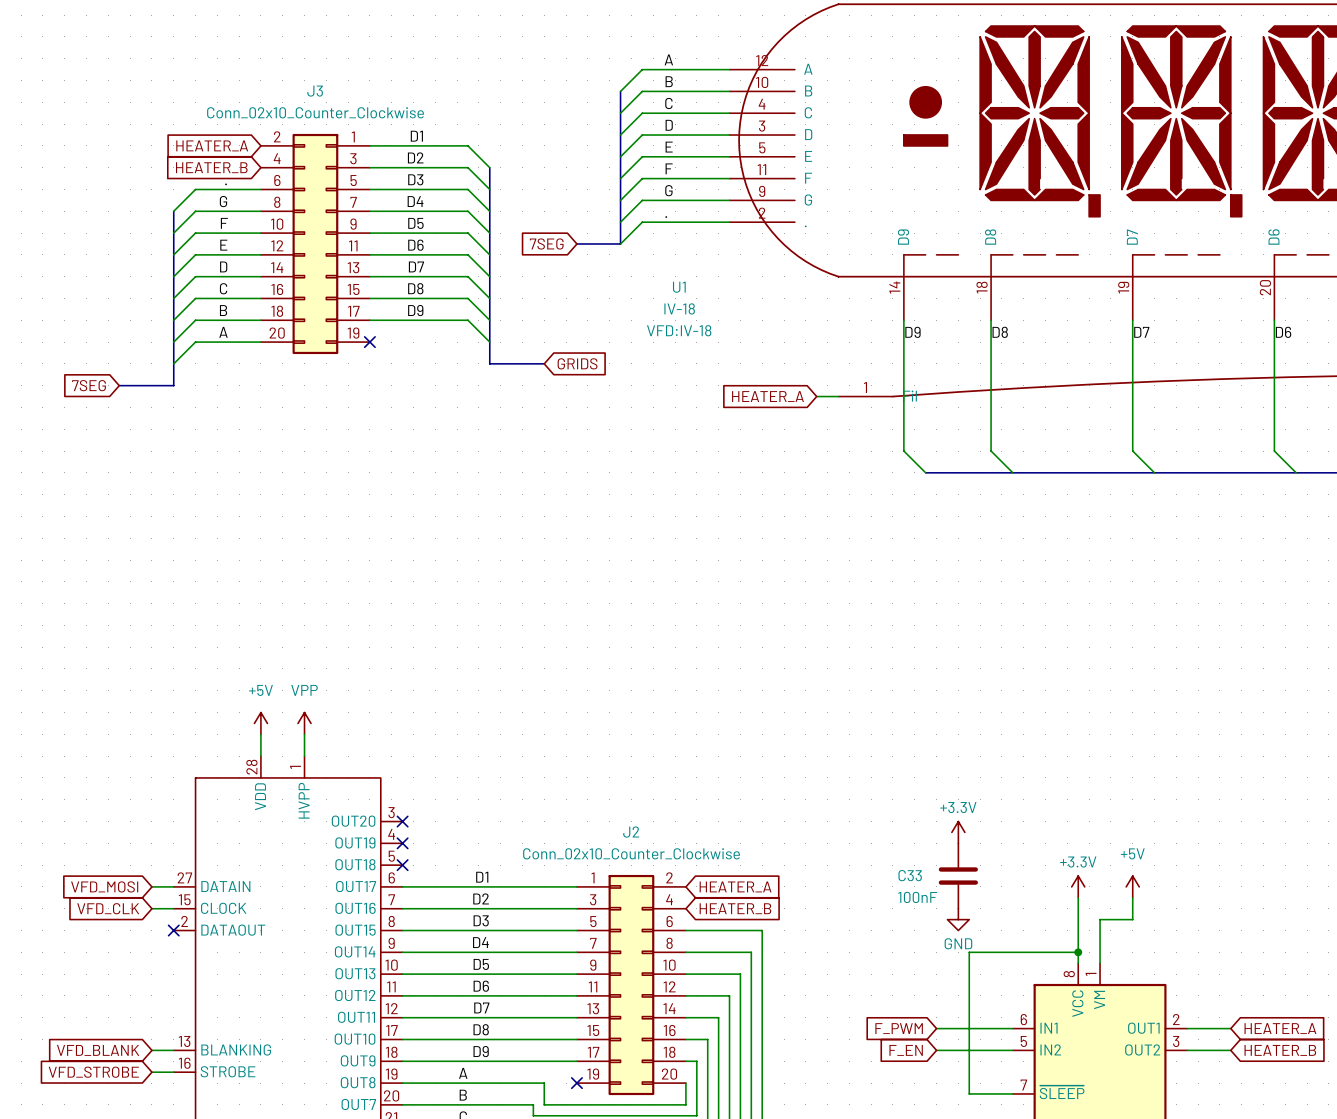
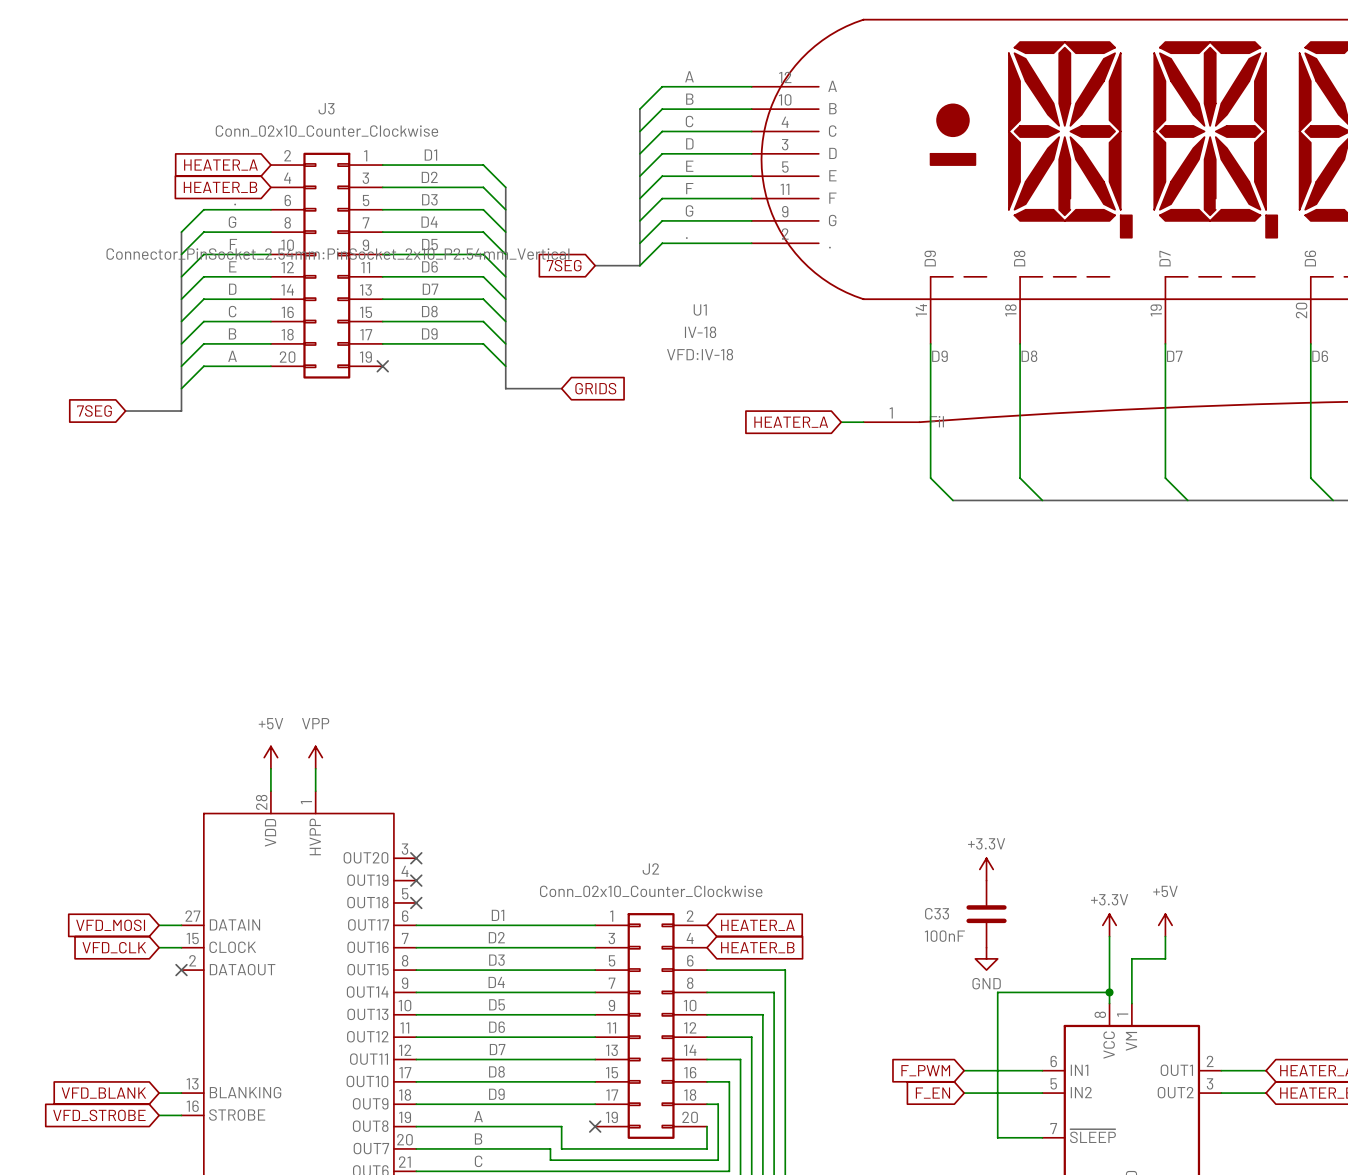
J3 text: none -> Connector_PinSocket_2.54mm:PinSocket_2x10_P2.54mm_Vertical (337, 254)

